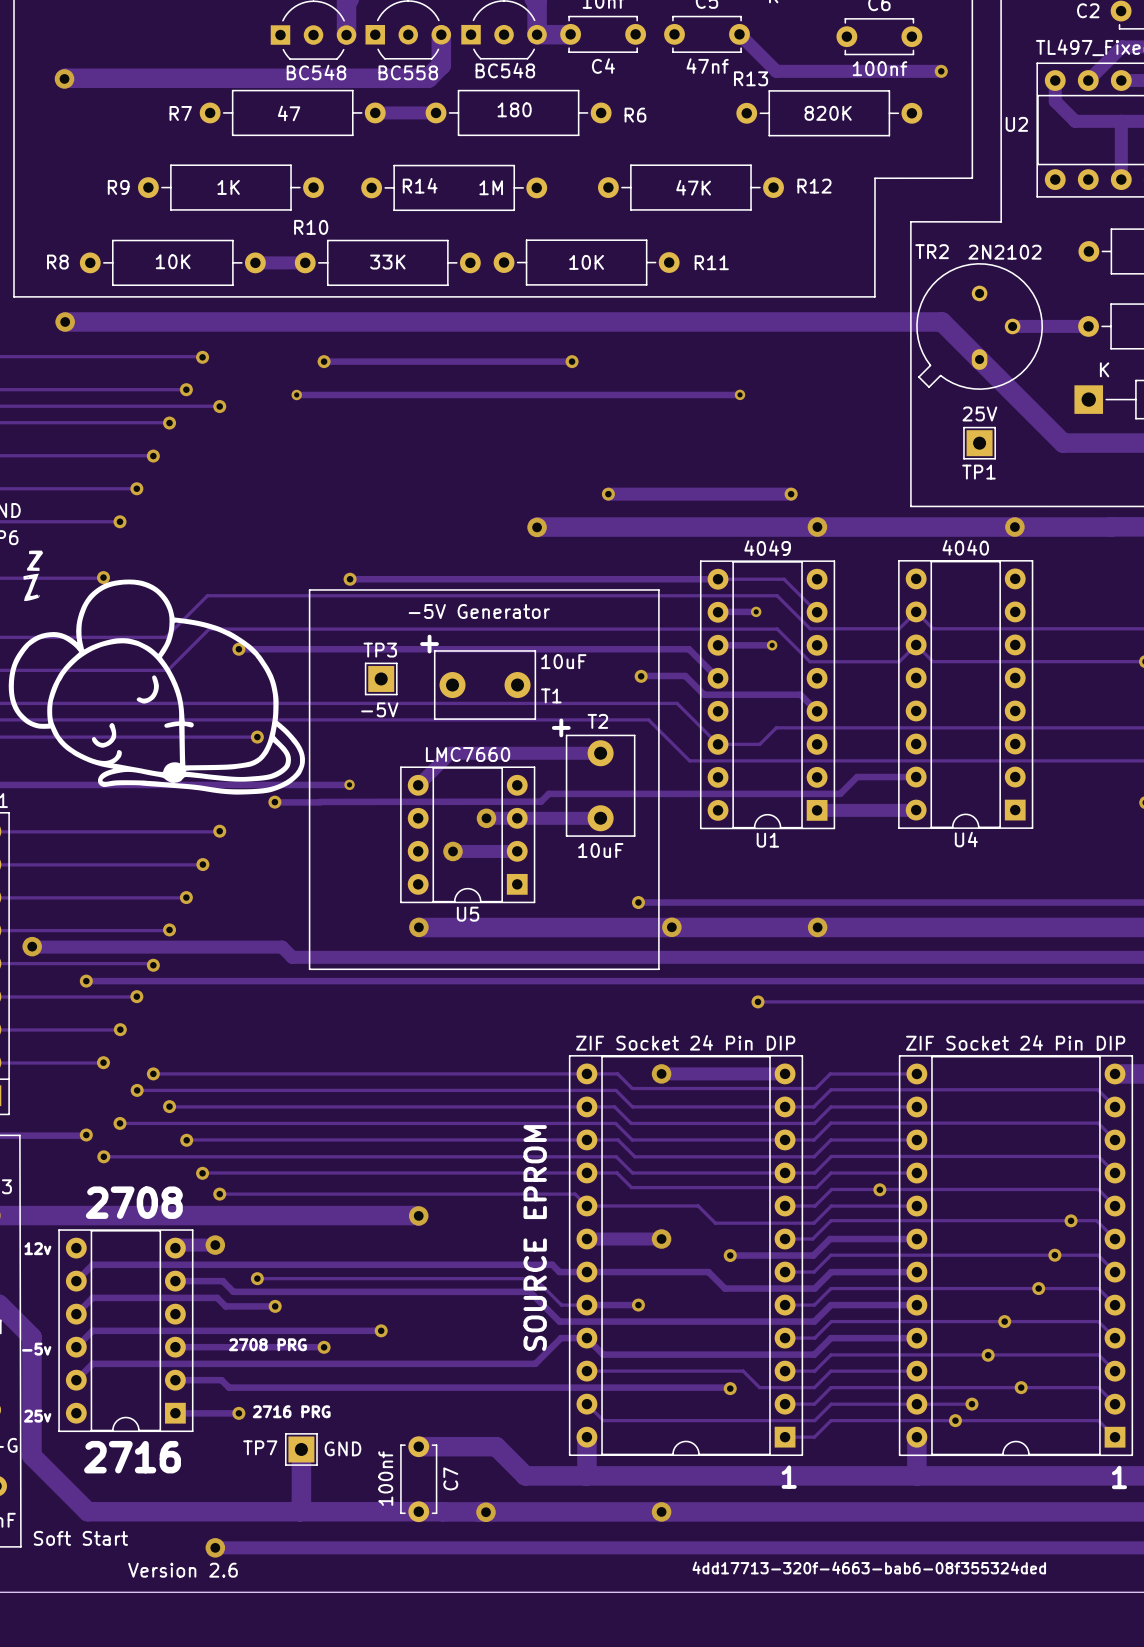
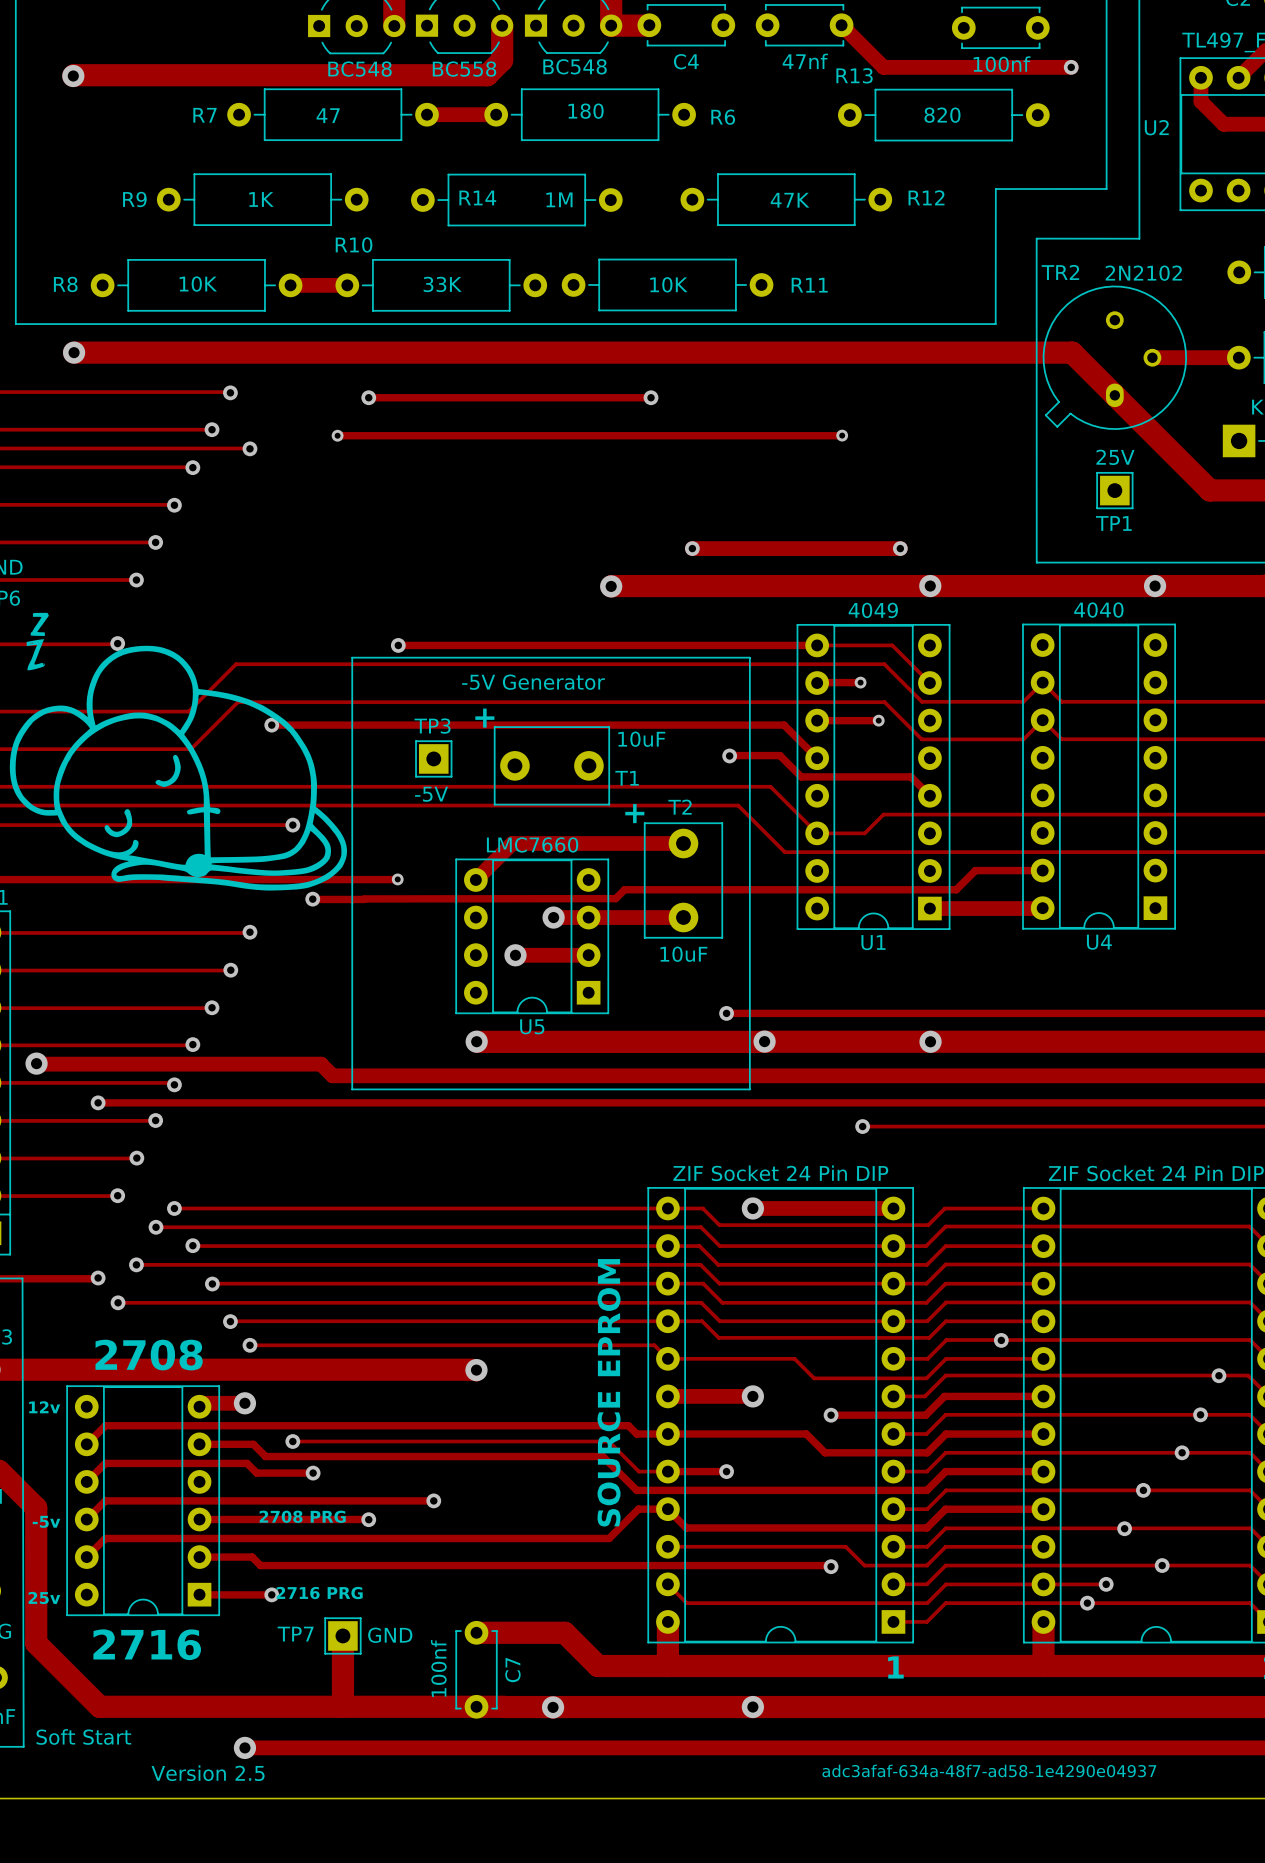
R13 value: 820K (828, 113) -> 820 (942, 115)
text: 4dd17713-320f-4663-bab6-08f355324ded (869, 1567) -> adc3afaf-634a-48f7-ad58-1e4290e04937 (989, 1770)
text: Version 2.6 (182, 1570) -> Version 2.5 (208, 1773)

